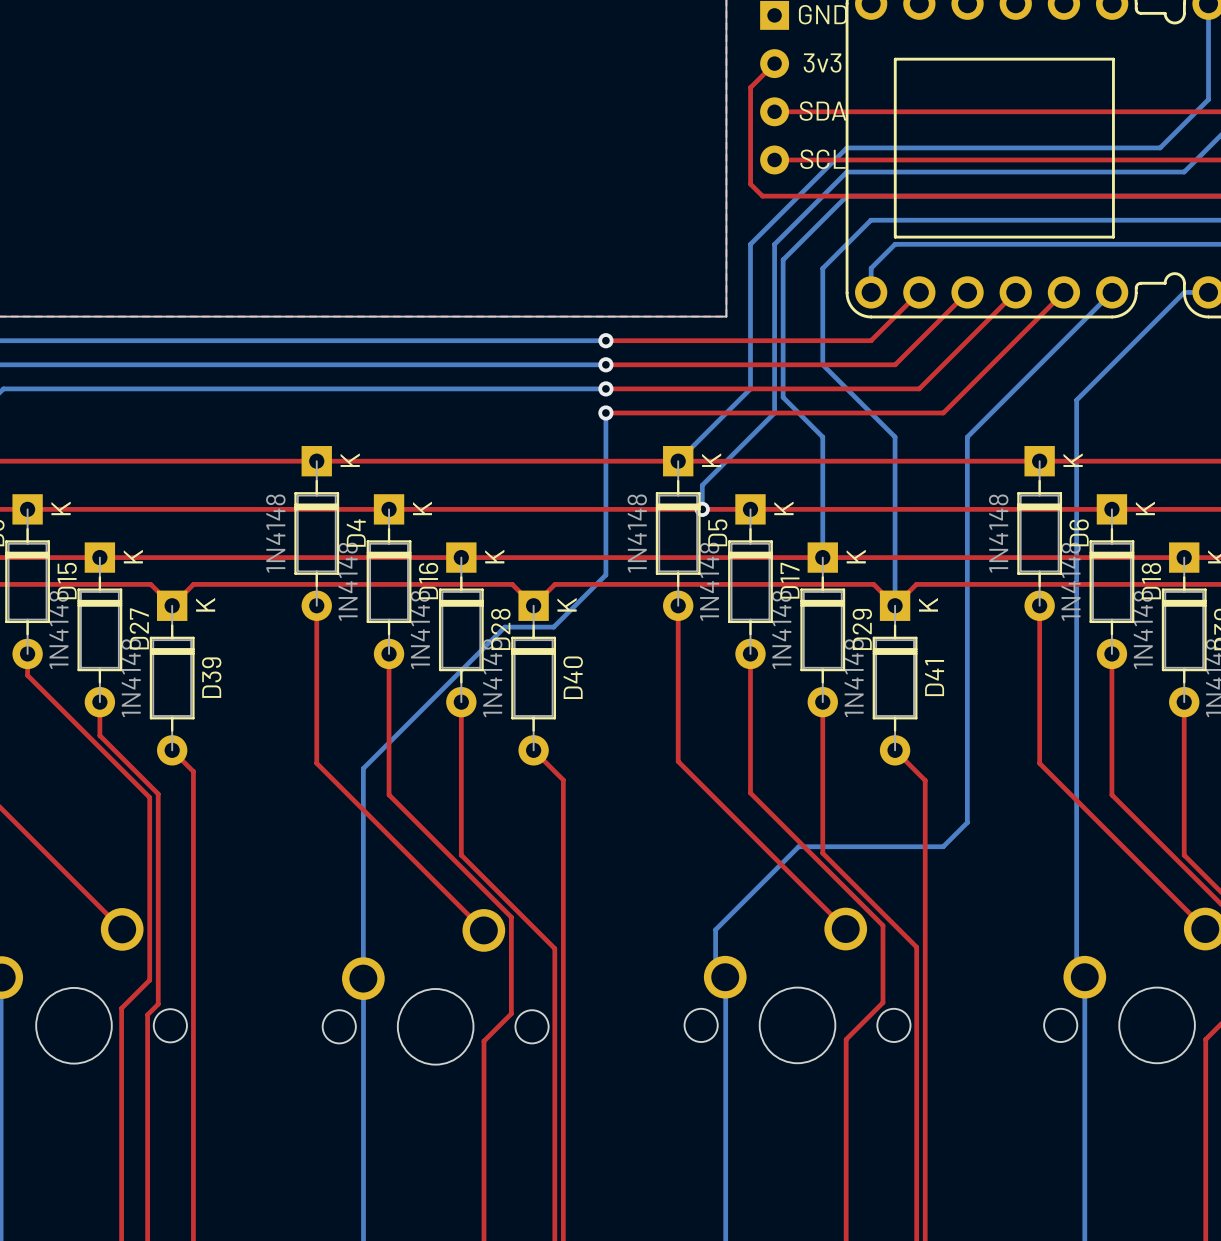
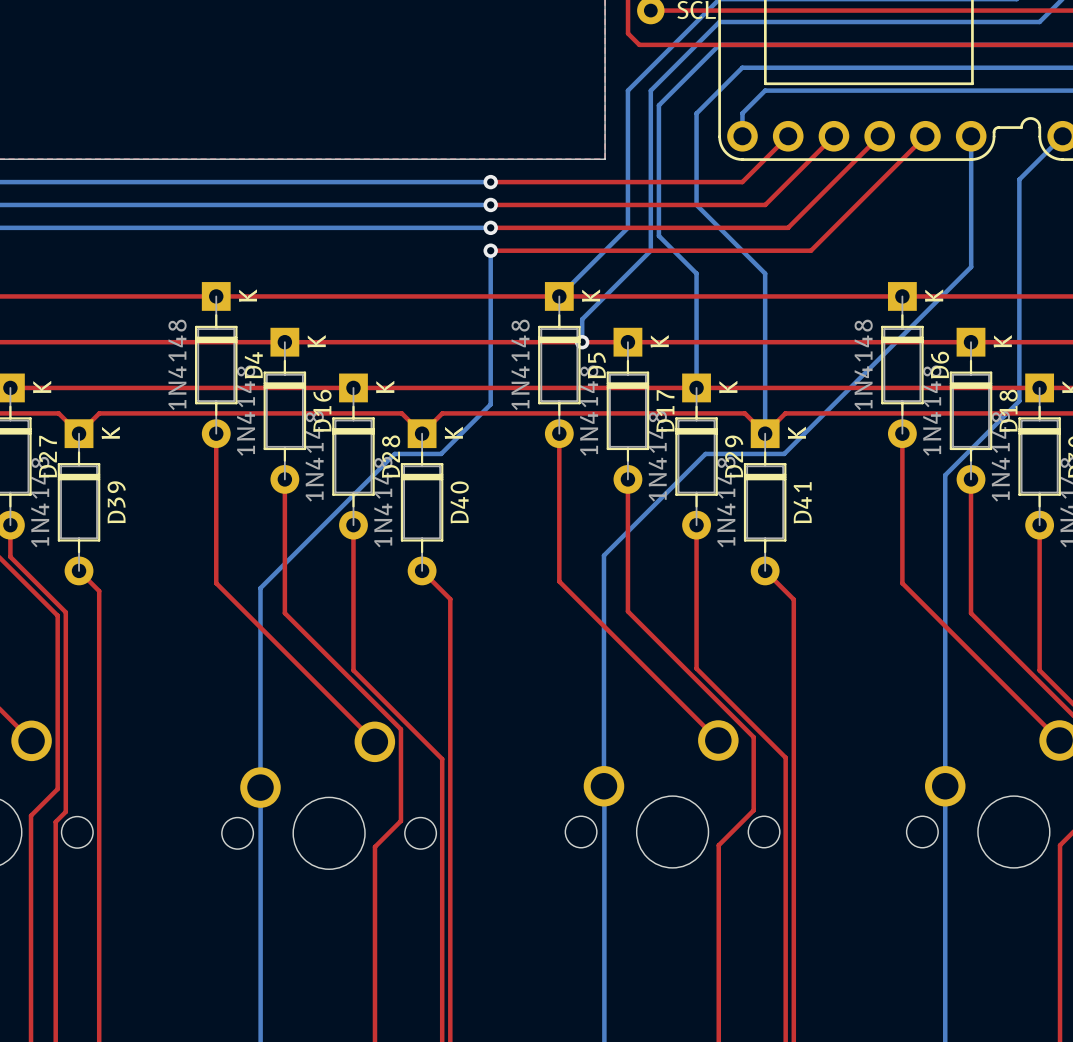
bottom track: (1112, 292) (967, 437) (967, 822) (943, 846) (798, 846) (715, 929) (715, 992) -> (971, 136) (971, 267) (784, 453) (705, 453) (603, 555) (603, 786)
bottom track: (1208, 292) (1184, 292) (1076, 400) (1076, 992) -> (1062, 136) (1019, 179) (1019, 401) (945, 475) (945, 786)

